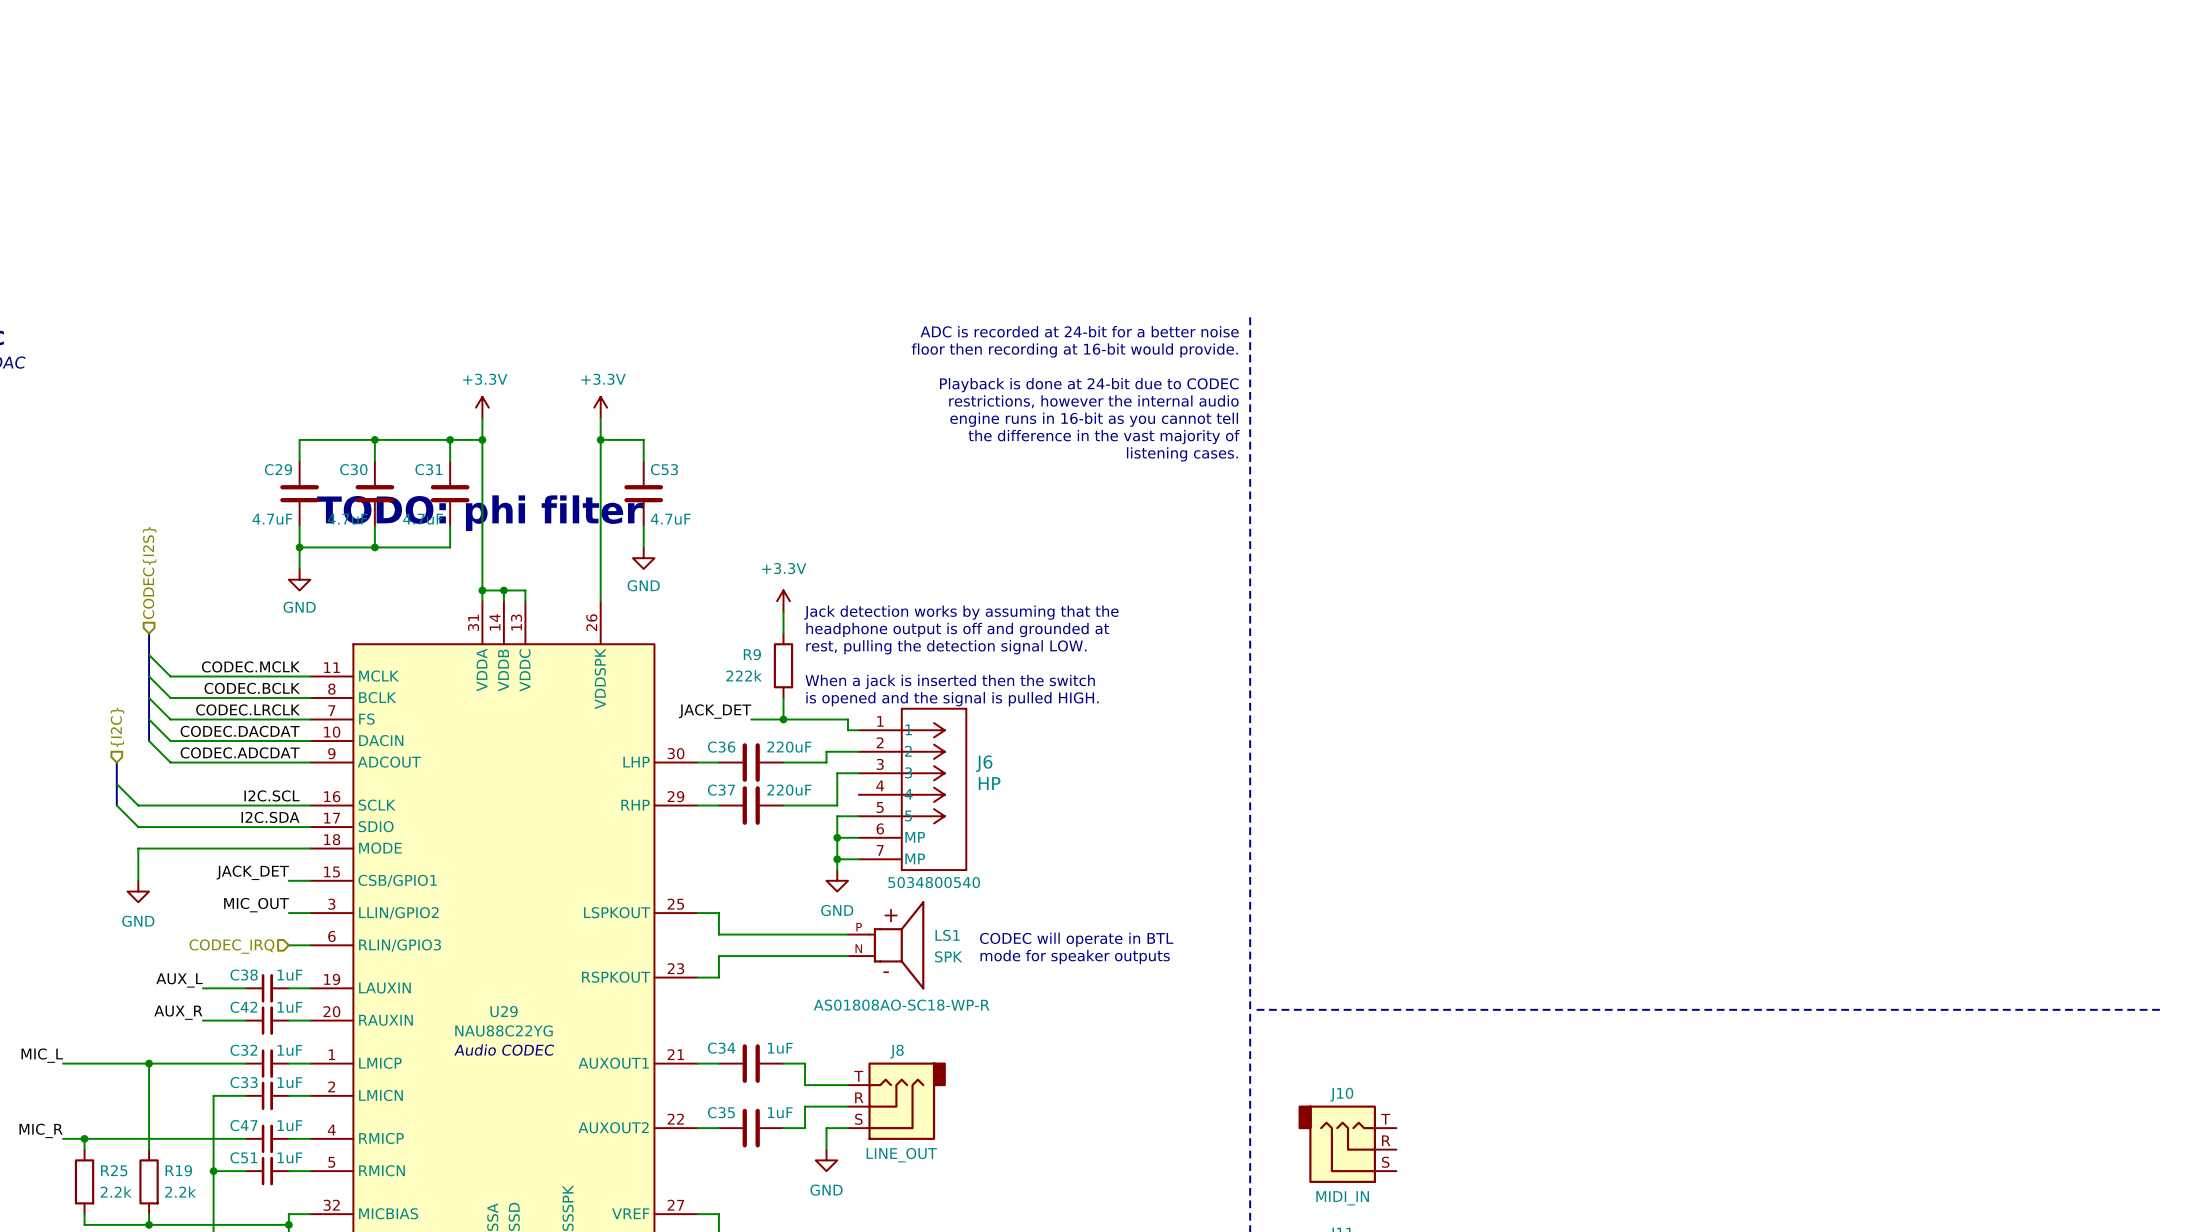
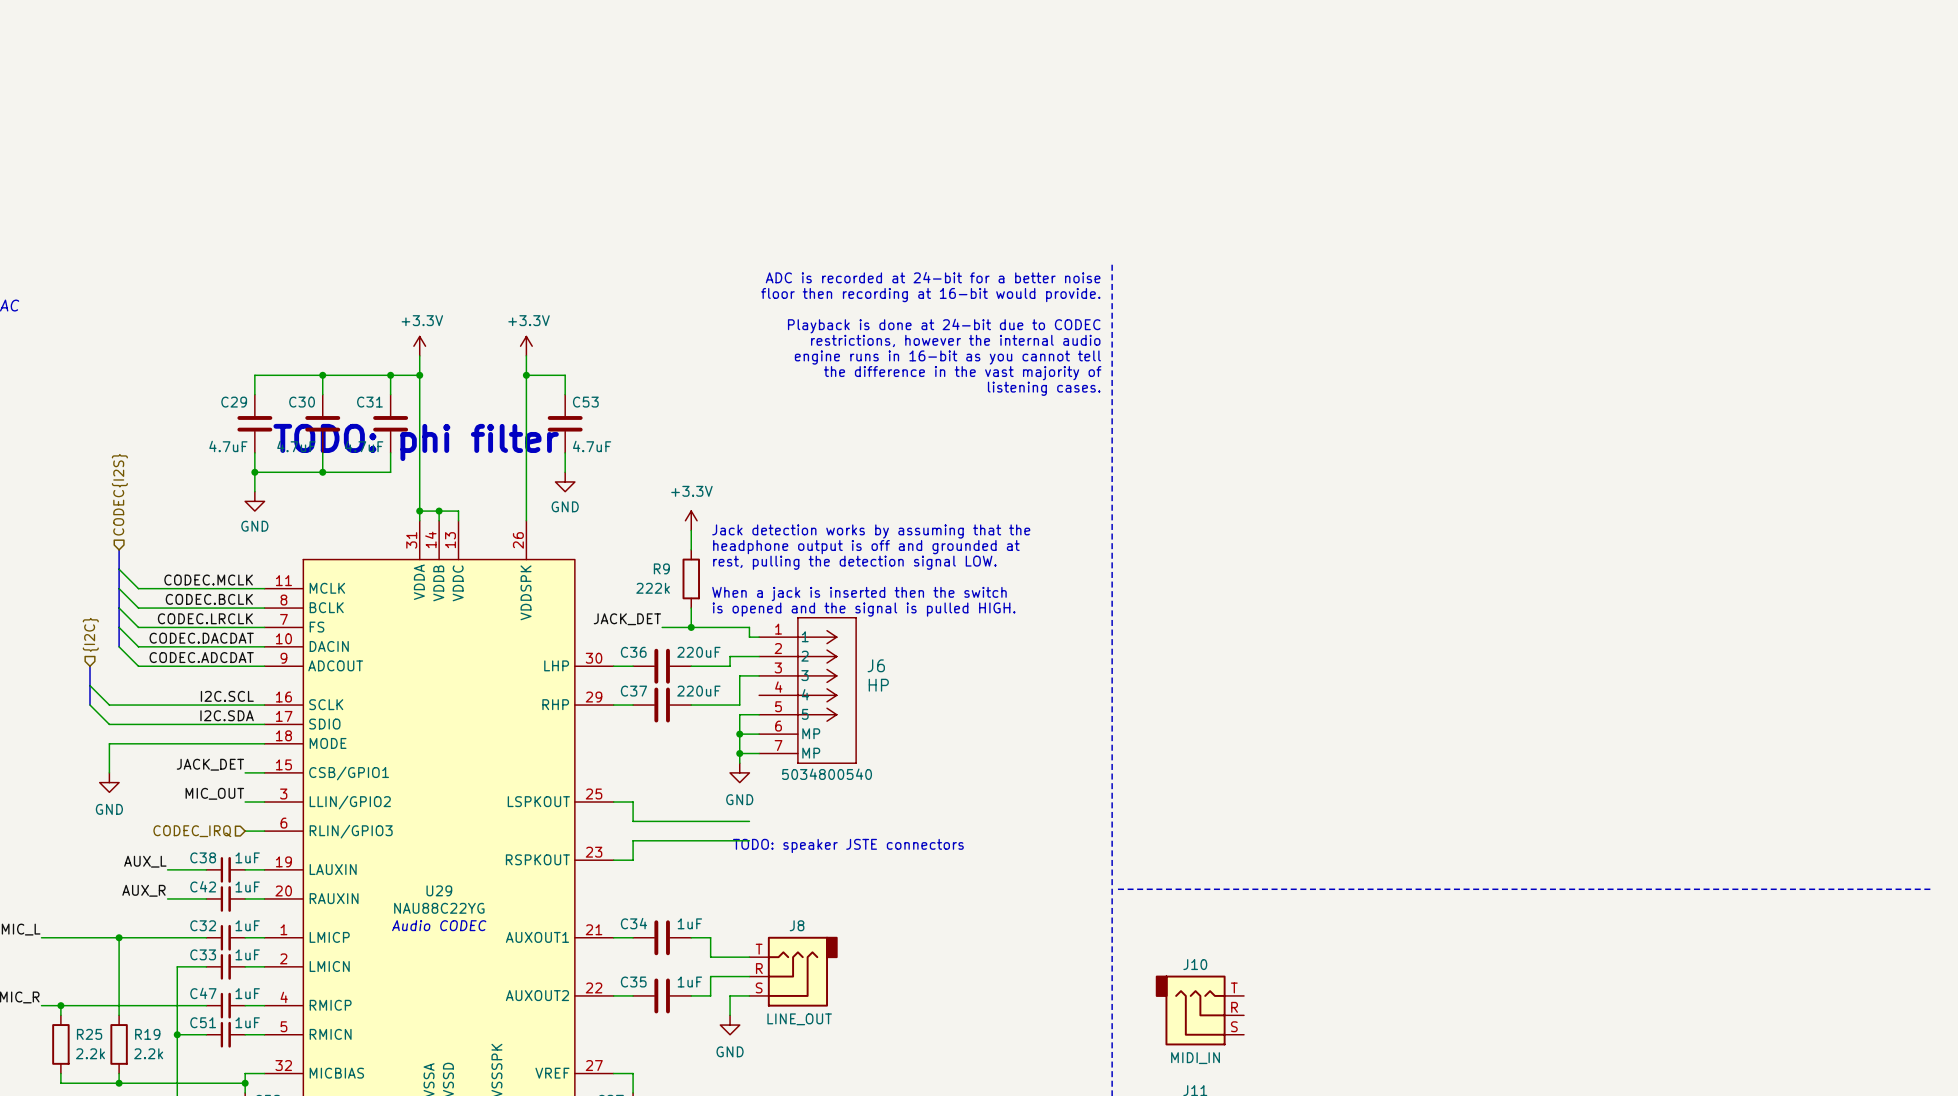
text: CODEC will operate in BTL (1076, 939) -> none
LS1: SPK (886, 945) -> none
text: mode for speaker outputs (1075, 957) -> none
text: none -> TODO: speaker JSTE connectors (848, 845)

